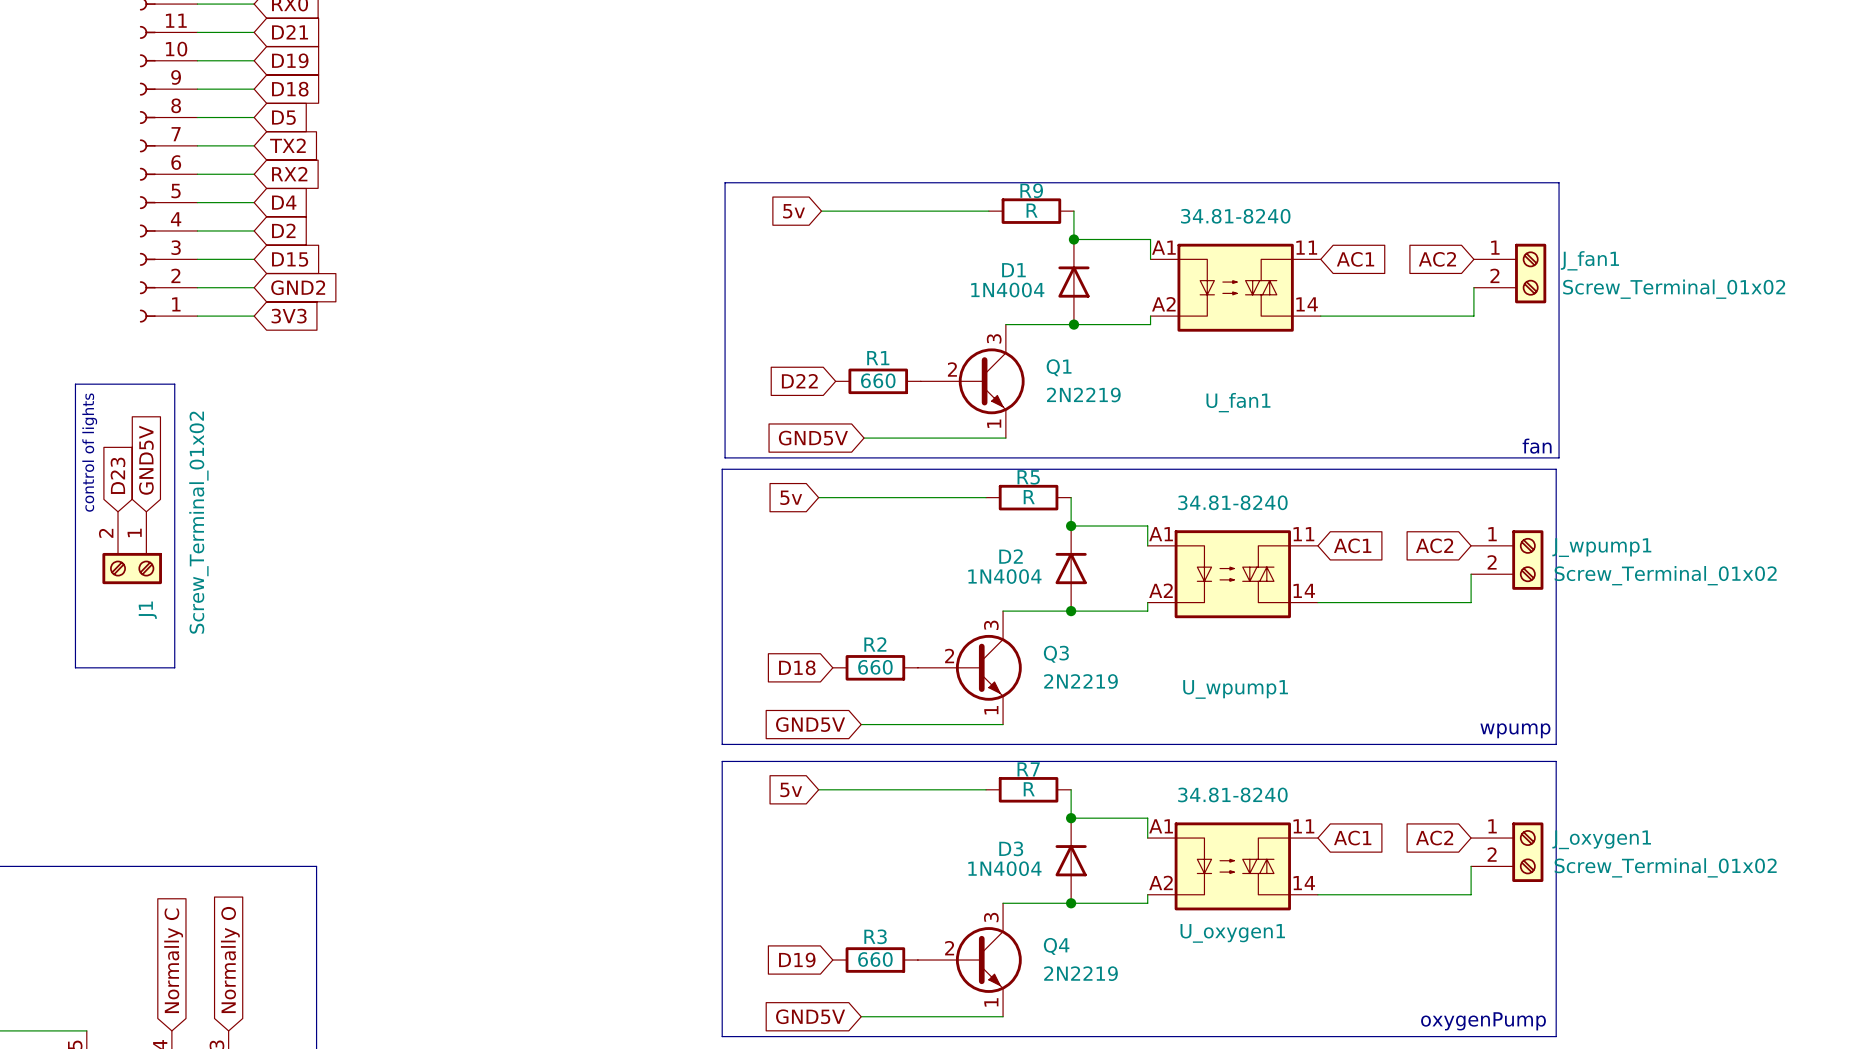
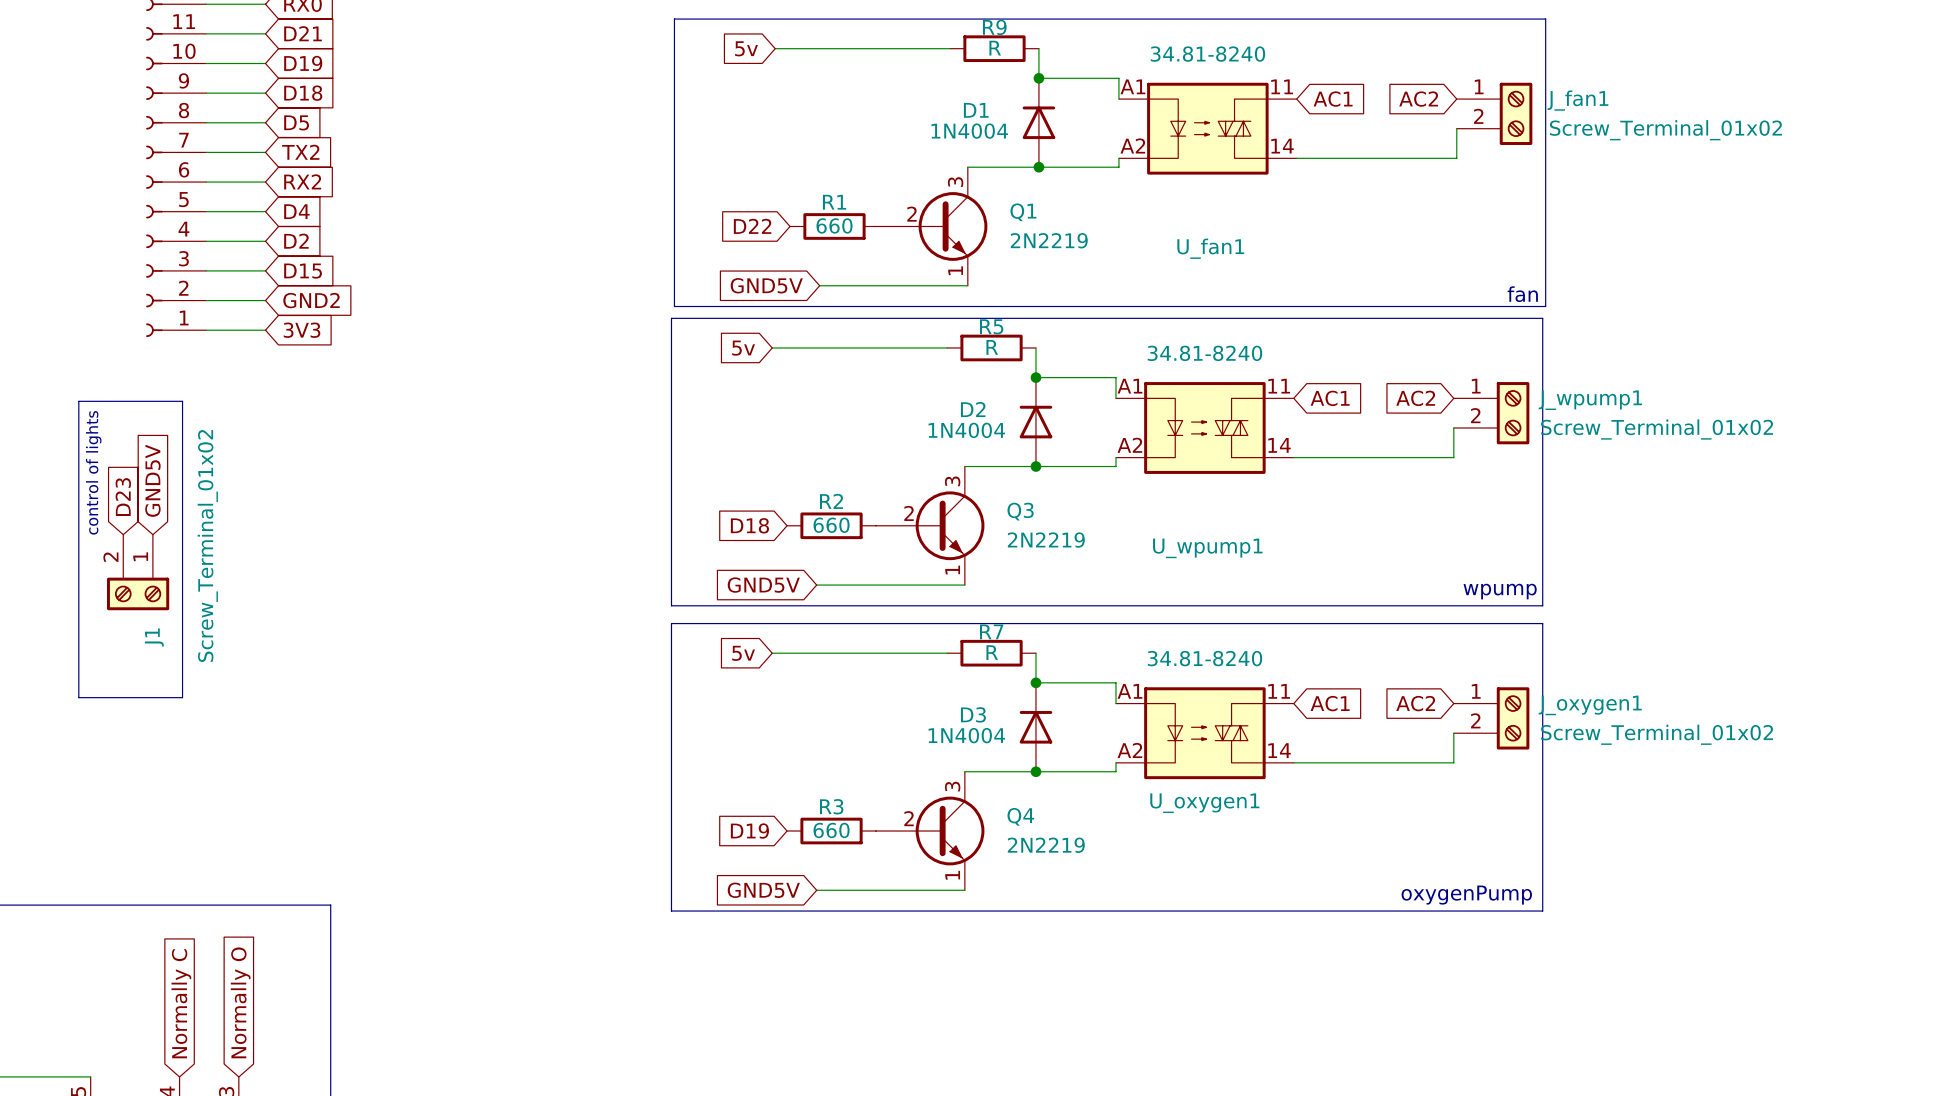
global label: none -> 5v (746, 48)
junction: none -> (1038, 78)
global label: none -> AC1 (1333, 99)
global label: none -> AC2 (1418, 99)
junction: none -> (1038, 167)
line: (725, 182) (725, 457) (1559, 457) (1559, 182) (725, 182) -> (674, 19) (674, 306) (1545, 306) (1545, 19) (674, 19)
global label: 5v (794, 211) -> none
wire: (821, 211) (988, 211) -> (775, 48) (950, 48)
R9 position: (1031, 211) -> (994, 48)
wire: (1073, 211) (1073, 239) (1150, 239) (1150, 259) -> (1038, 48) (1038, 78) (1118, 78) (1118, 99)
junction: (1073, 239) -> none
global label: AC1 (1355, 259) -> none
global label: AC2 (1437, 259) -> none
global label: none -> GND5V (766, 285)
J_fan1 position: (1510, 273) -> (1494, 113)
D1 position: (1073, 282) -> (1038, 122)
U_fan1 position: (1235, 287) -> (1207, 128)
wire: (1473, 287) (1473, 316) (1320, 316) -> (1456, 128) (1456, 158) (1296, 158)
wire: (1150, 316) (1150, 324) (1005, 324) -> (1118, 158) (1118, 167) (967, 167)
junction: (1073, 324) -> none
global label: none -> 5v (743, 348)
junction: none -> (1035, 377)
global label position: D22 (799, 381) -> D22 (752, 226)
R1 position: (878, 381) -> (834, 226)
Q1 position: (972, 381) -> (933, 226)
global label: none -> AC1 (1330, 398)
global label: none -> AC2 (1415, 398)
global label: GND5V (813, 438) -> none
wire: (864, 438) (1005, 438) -> (819, 285) (967, 285)
junction: none -> (1035, 466)
text position: fan (1537, 446) -> fan (1522, 294)
line: (722, 469) (1556, 469) (1556, 744) (722, 744) (722, 469) -> (671, 318) (1542, 318) (1542, 605) (671, 605) (671, 318)
global label: 5v (791, 497) -> none
wire: (818, 497) (986, 497) -> (772, 347) (947, 347)
R5 position: (1028, 497) -> (991, 347)
wire: (1071, 497) (1071, 526) (1147, 526) (1147, 545) -> (1035, 347) (1035, 377) (1115, 377) (1115, 398)
junction: (1071, 526) -> none
global label: AC1 (1352, 545) -> none
global label: AC2 (1434, 545) -> none
global label: none -> GND5V (763, 585)
J_wpump1 position: (1507, 560) -> (1491, 413)
D2 position: (1071, 568) -> (1035, 422)
U_wpump1 position: (1232, 574) -> (1204, 427)
wire: (1471, 574) (1471, 602) (1317, 602) -> (1453, 427) (1453, 457) (1293, 457)
wire: (1147, 602) (1147, 611) (1003, 611) -> (1115, 457) (1115, 466) (964, 466)
junction: (1071, 611) -> none
global label: none -> 5v (743, 653)
junction: none -> (1035, 682)
global label position: D18 (797, 667) -> D18 (749, 525)
R2 position: (875, 667) -> (831, 525)
Q3 position: (969, 667) -> (930, 525)
global label: none -> AC1 (1330, 703)
global label: none -> AC2 (1415, 703)
global label: GND5V (810, 724) -> none
wire: (861, 724) (1003, 724) -> (816, 585) (964, 585)
text position: wpump (1515, 730) -> wpump (1500, 591)
junction: none -> (1035, 771)
line: (722, 761) (722, 1036) (1556, 1036) (1556, 761) (722, 761) -> (671, 623) (671, 911) (1542, 911) (1542, 623) (671, 623)
global label: 5v (791, 789) -> none
wire: (818, 789) (986, 789) -> (772, 653) (947, 653)
R7 position: (1028, 789) -> (991, 653)
wire: (1071, 789) (1071, 818) (1147, 818) (1147, 838) -> (1035, 653) (1035, 682) (1115, 682) (1115, 703)
junction: (1071, 818) -> none
global label: AC1 (1352, 838) -> none
global label: AC2 (1434, 838) -> none
global label: none -> GND5V (763, 890)
J_oxygen1 position: (1507, 852) -> (1491, 718)
D3 position: (1071, 860) -> (1035, 727)
U_oxygen1 position: (1232, 866) -> (1204, 733)
wire: (1471, 866) (1471, 894) (1317, 894) -> (1453, 733) (1453, 762) (1293, 762)
wire: (1147, 894) (1147, 903) (1003, 903) -> (1115, 762) (1115, 771) (964, 771)
junction: (1071, 903) -> none
global label position: D19 (797, 960) -> D19 (749, 831)
R3 position: (875, 960) -> (831, 831)
Q4 position: (969, 960) -> (930, 831)
global label: GND5V (810, 1016) -> none
wire: (861, 1016) (1003, 1016) -> (816, 890) (964, 890)
text position: oxygenPump (1483, 1021) -> oxygenPump (1466, 895)

